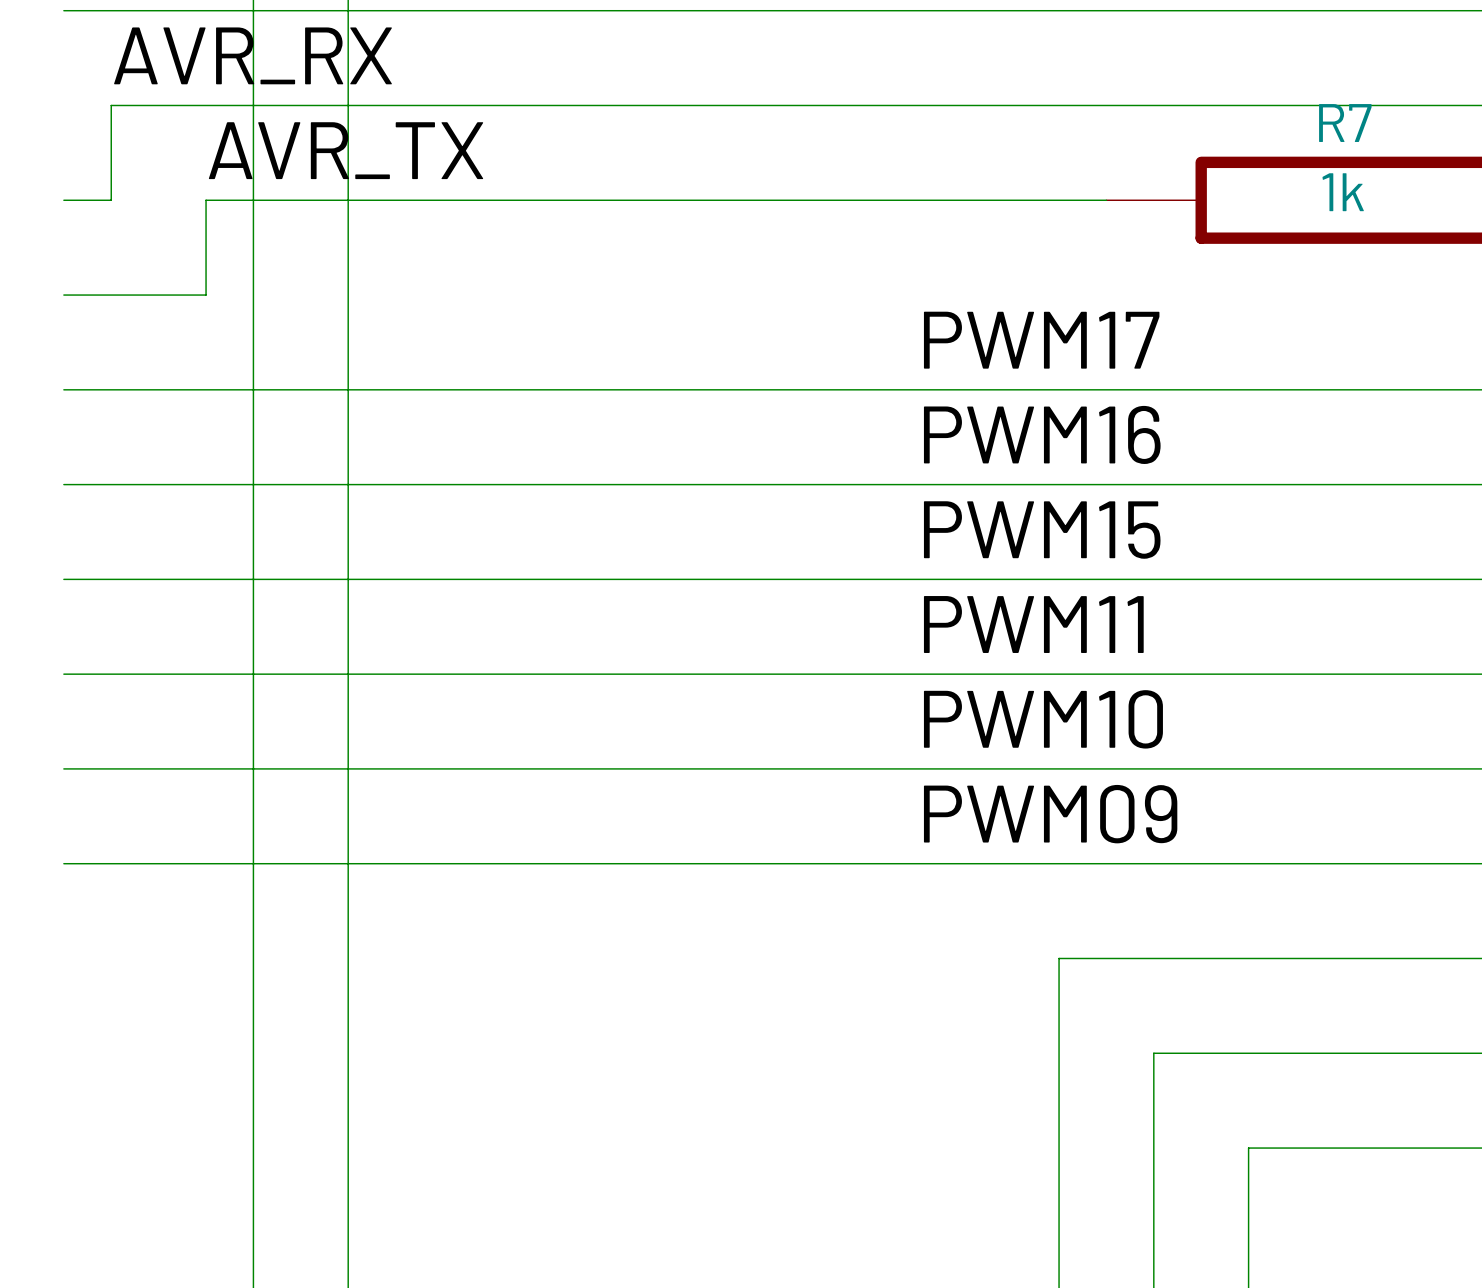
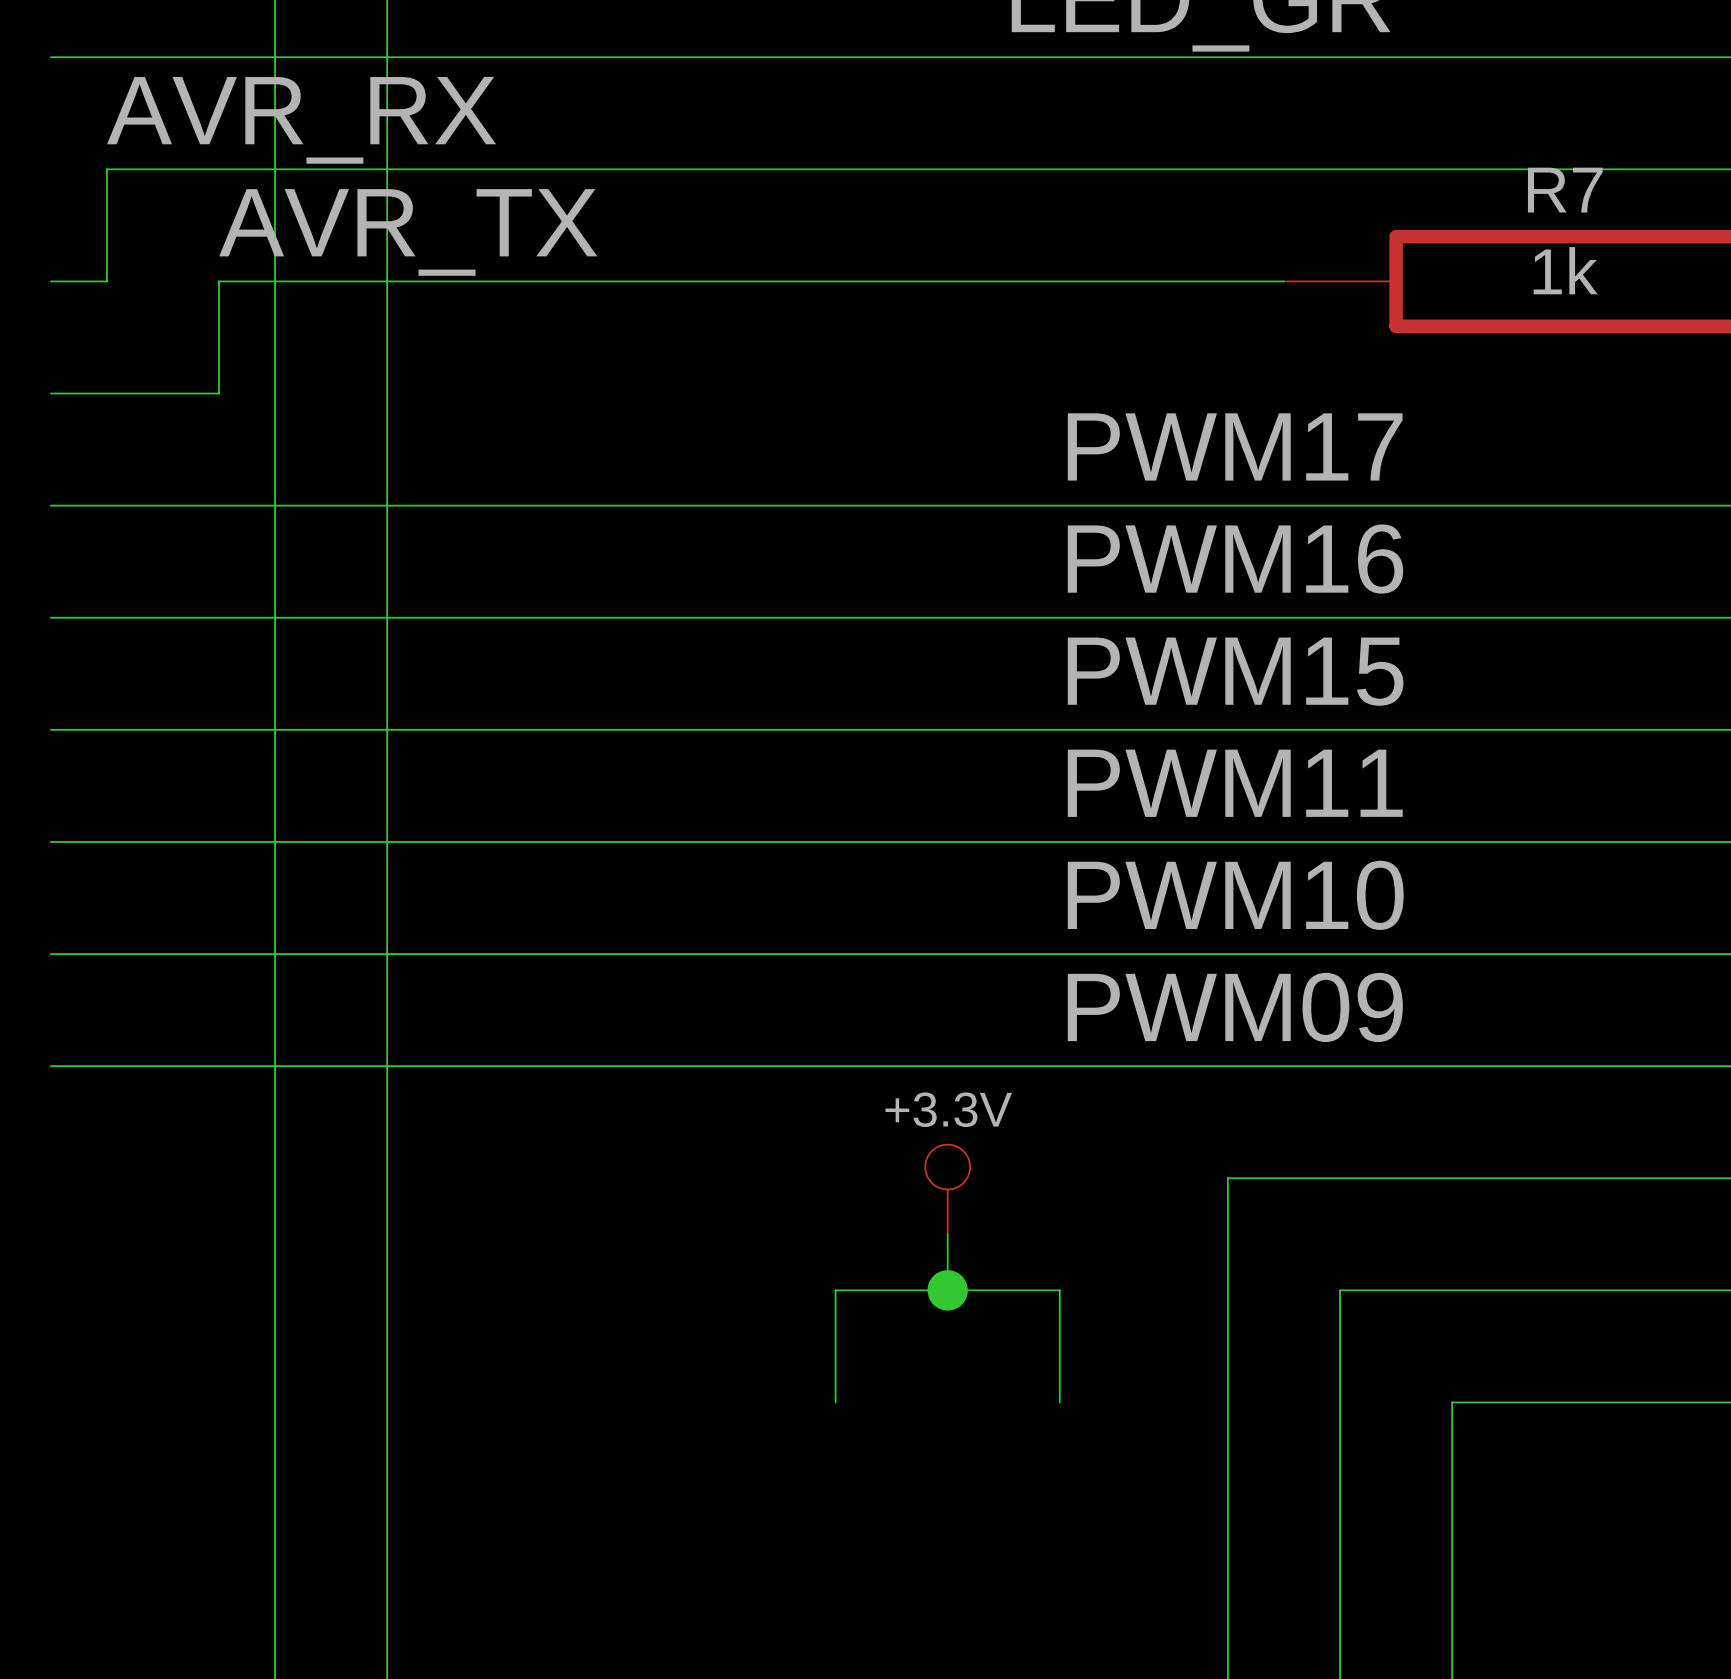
power symbol: none -> +3.3V (947, 1189)
wire: none -> (947, 1234) (947, 1290)
junction: none -> (947, 1290)
wire: none -> (835, 1402) (835, 1290) (1059, 1290) (1059, 1402)

